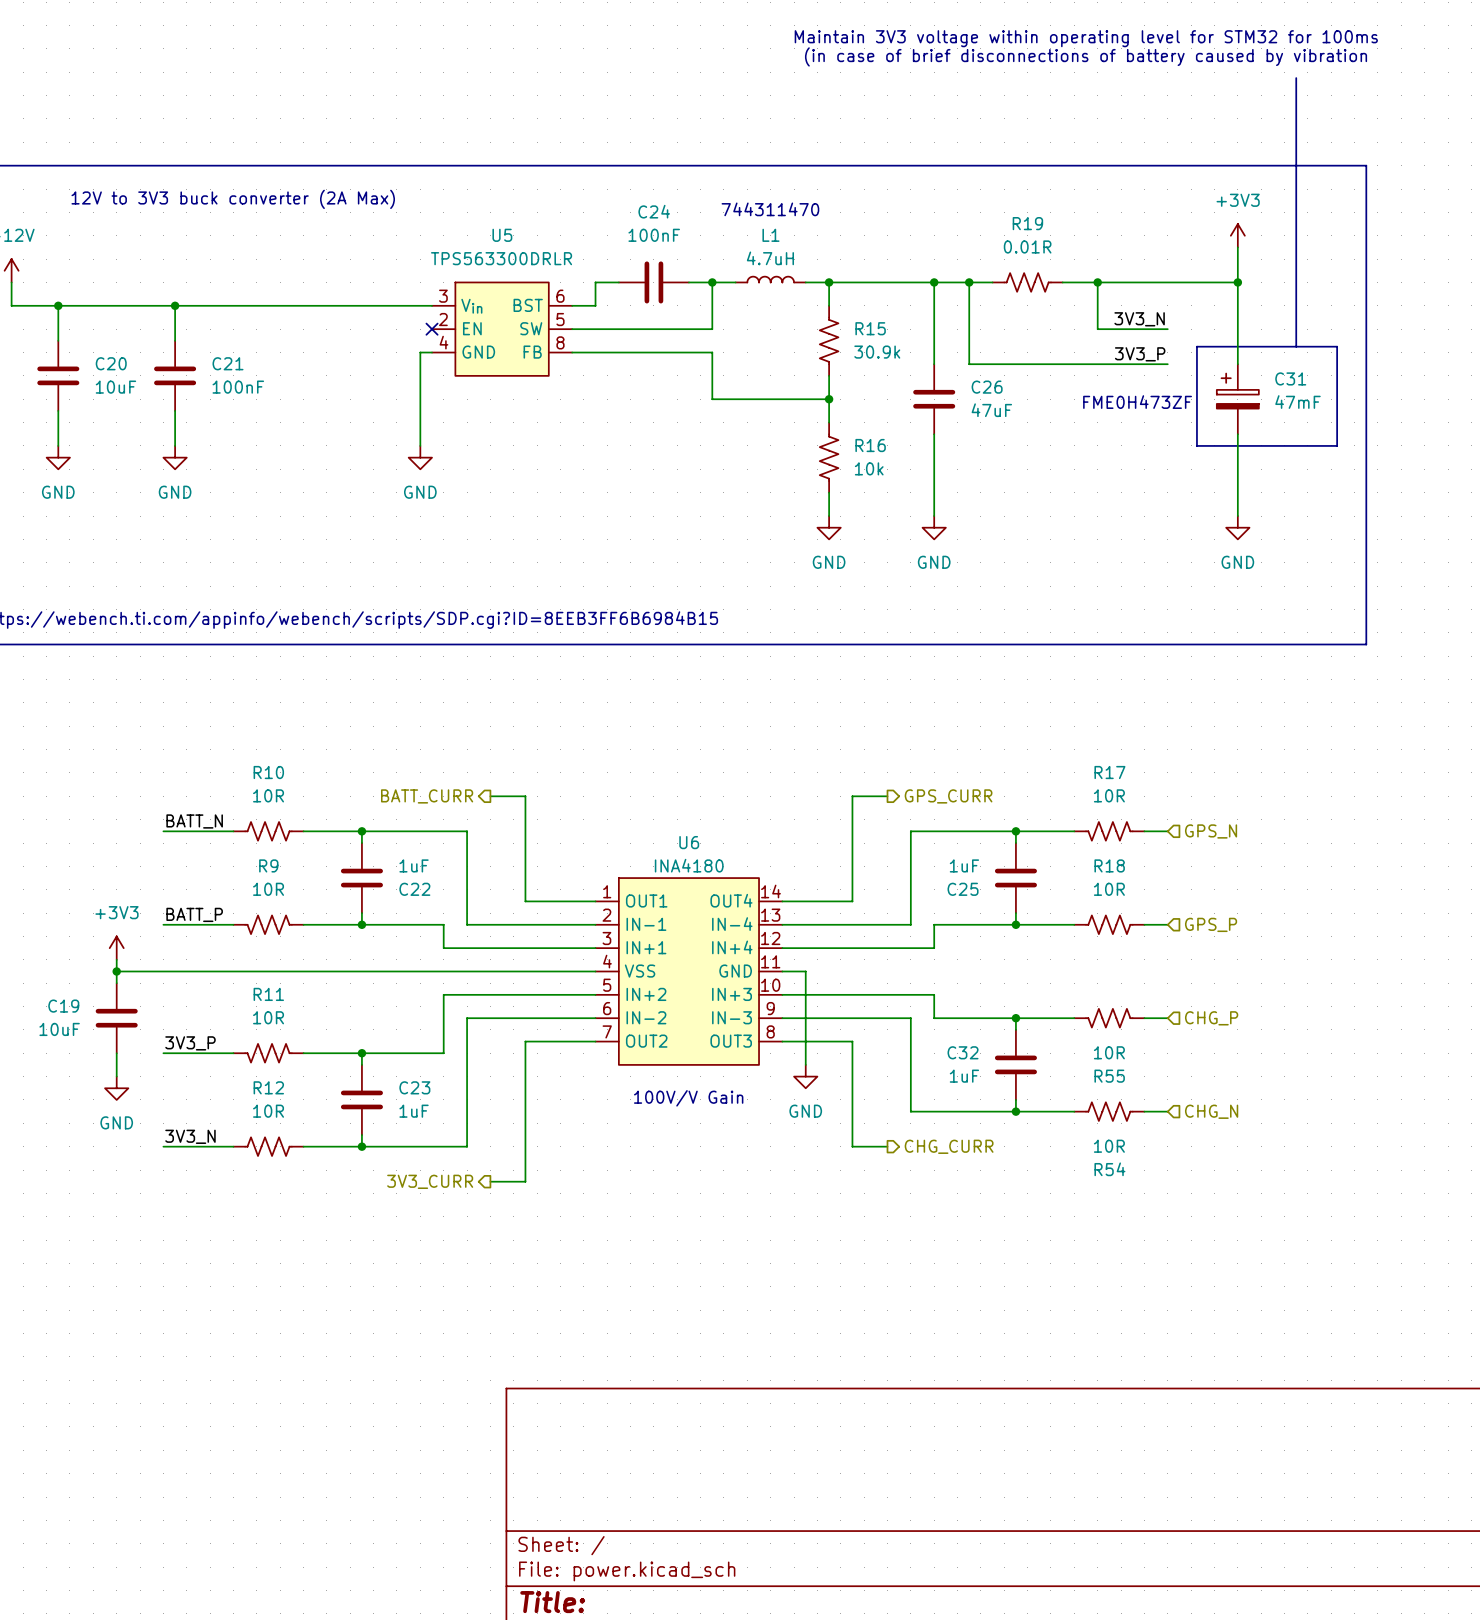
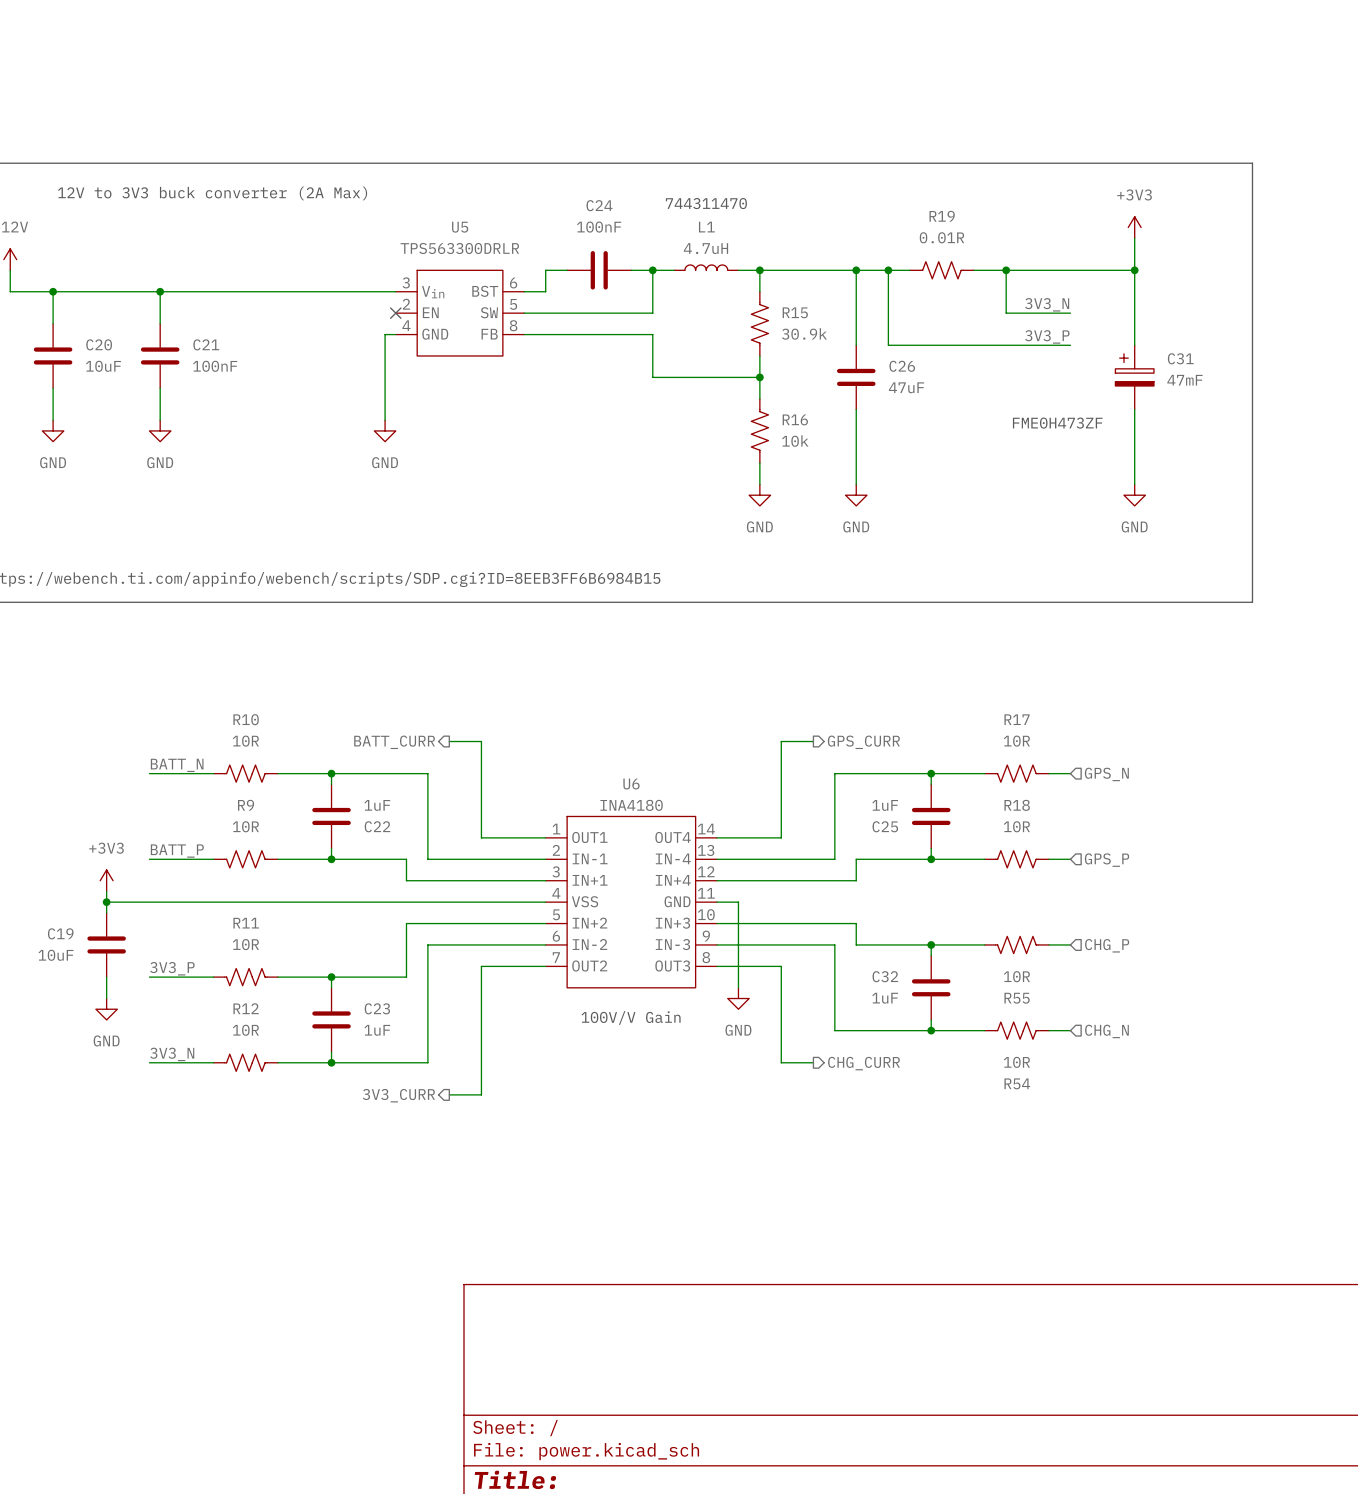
text: Maintain 3V3 voltage within operating level for STM32 for 100ms (1086, 38) -> none
text: (in case of brief disconnections of battery caused by vibration (1086, 56) -> none
line: (1296, 78) (1296, 346) -> none
line: (1196, 346) (1337, 346) (1337, 445) (1196, 445) (1196, 346) -> none
text position: FME0H473ZF (1137, 402) -> FME0H473ZF (1057, 423)

